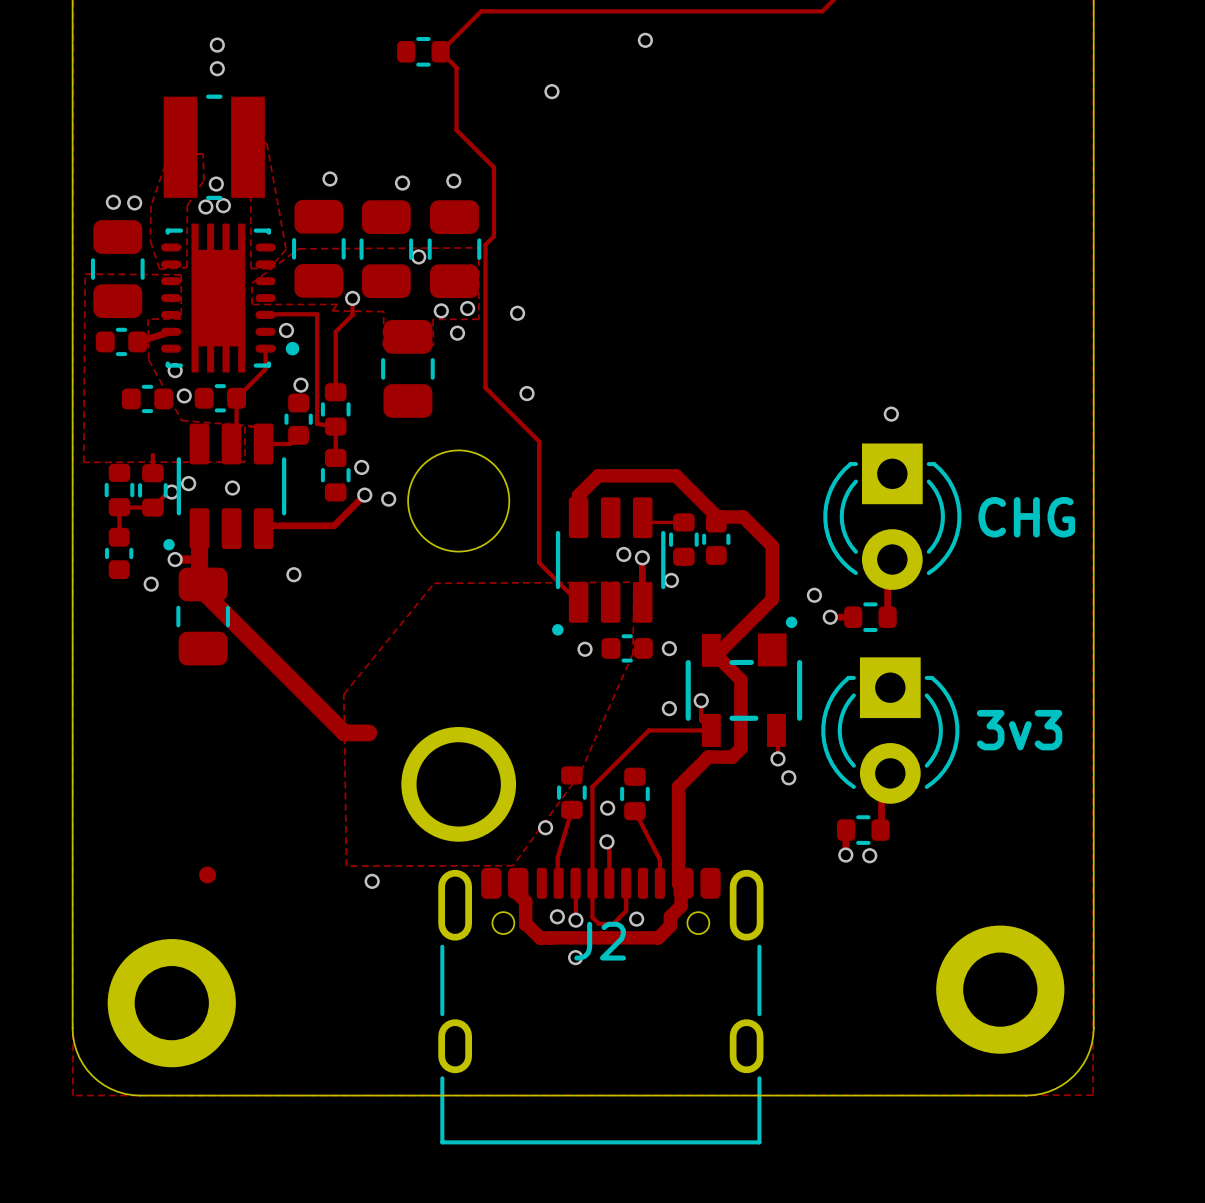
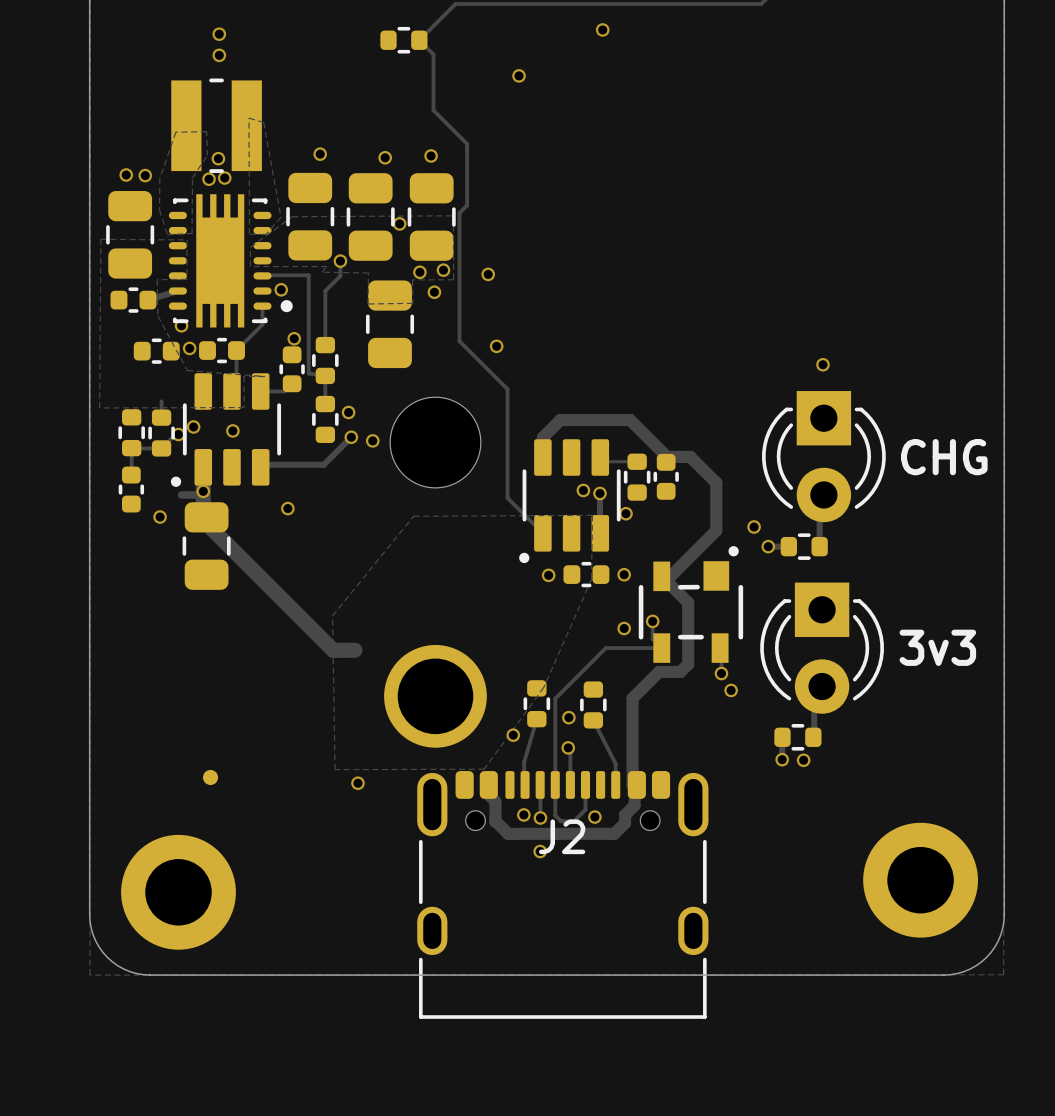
via position: (175, 559) -> (203, 491)

